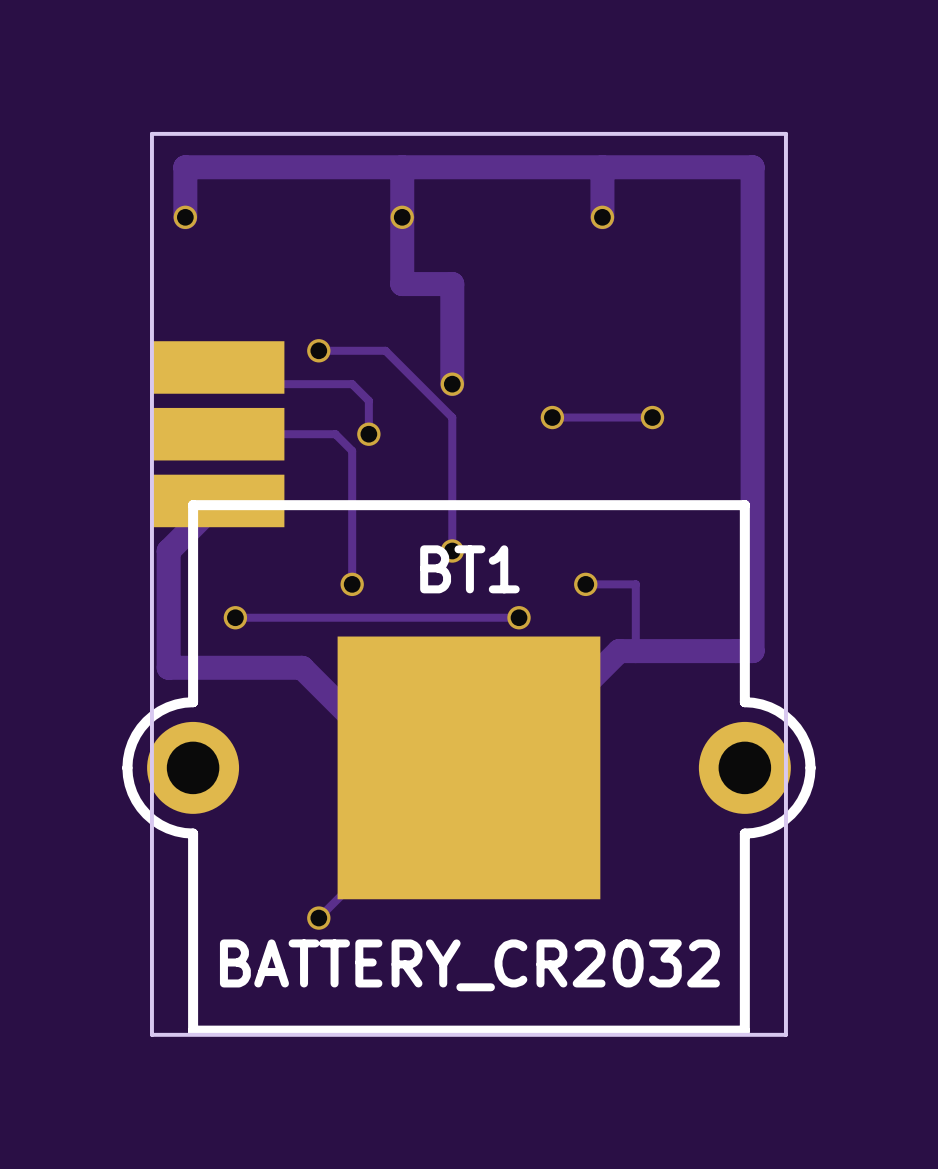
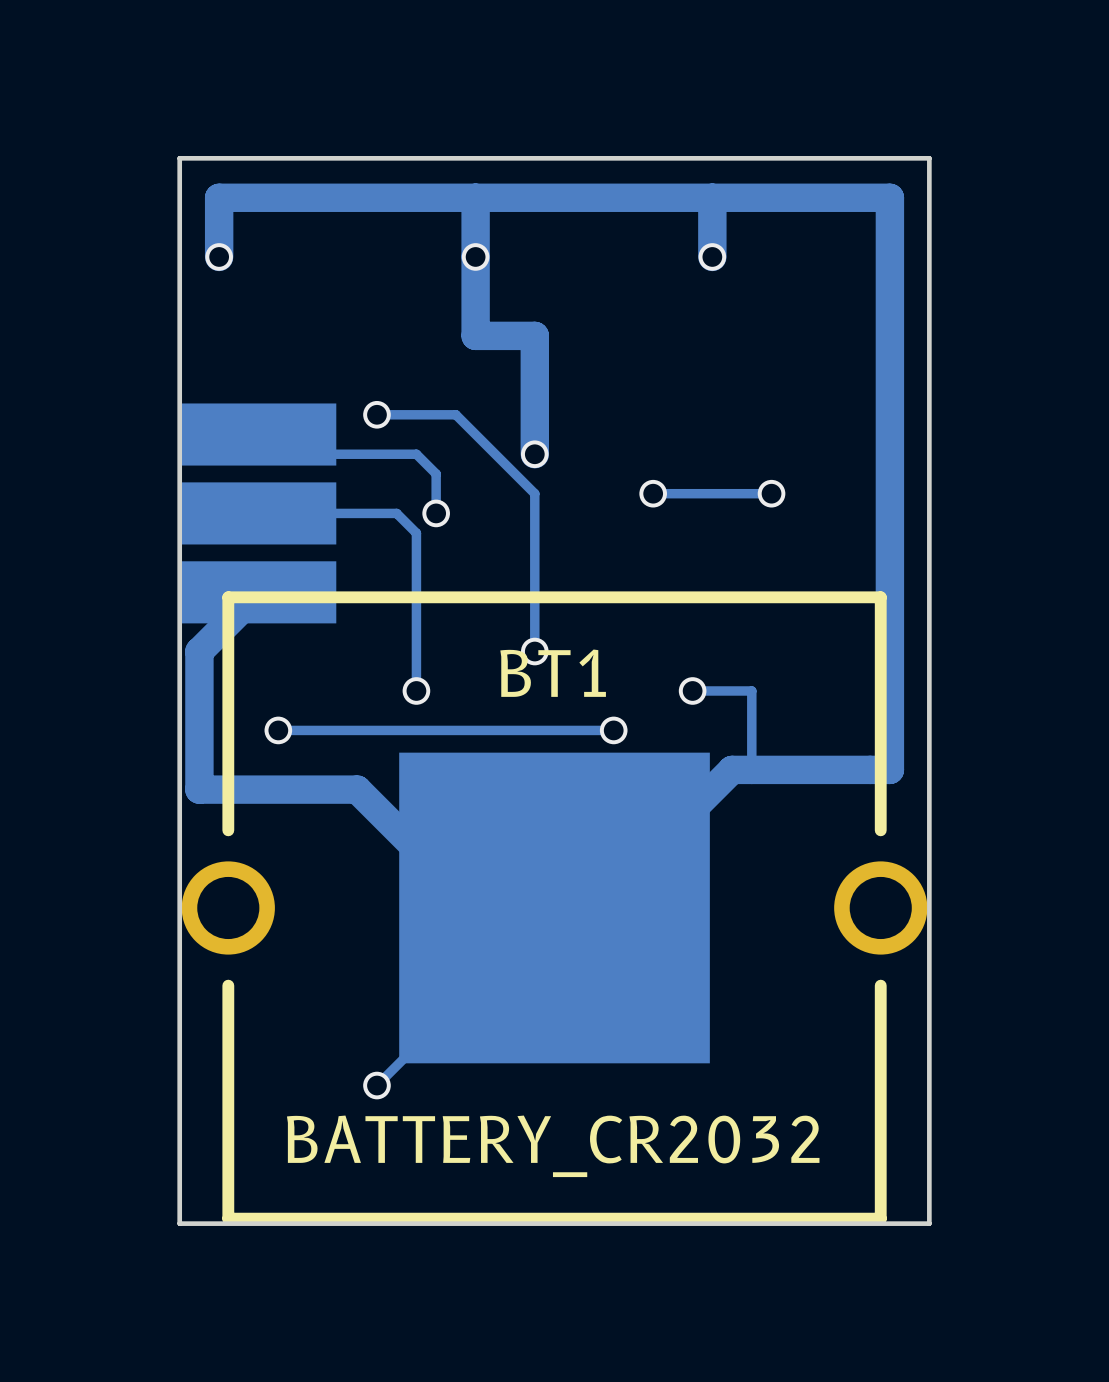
BT1 footprint: [122, 500, 816, 1036] -> [181, 591, 928, 1225]

